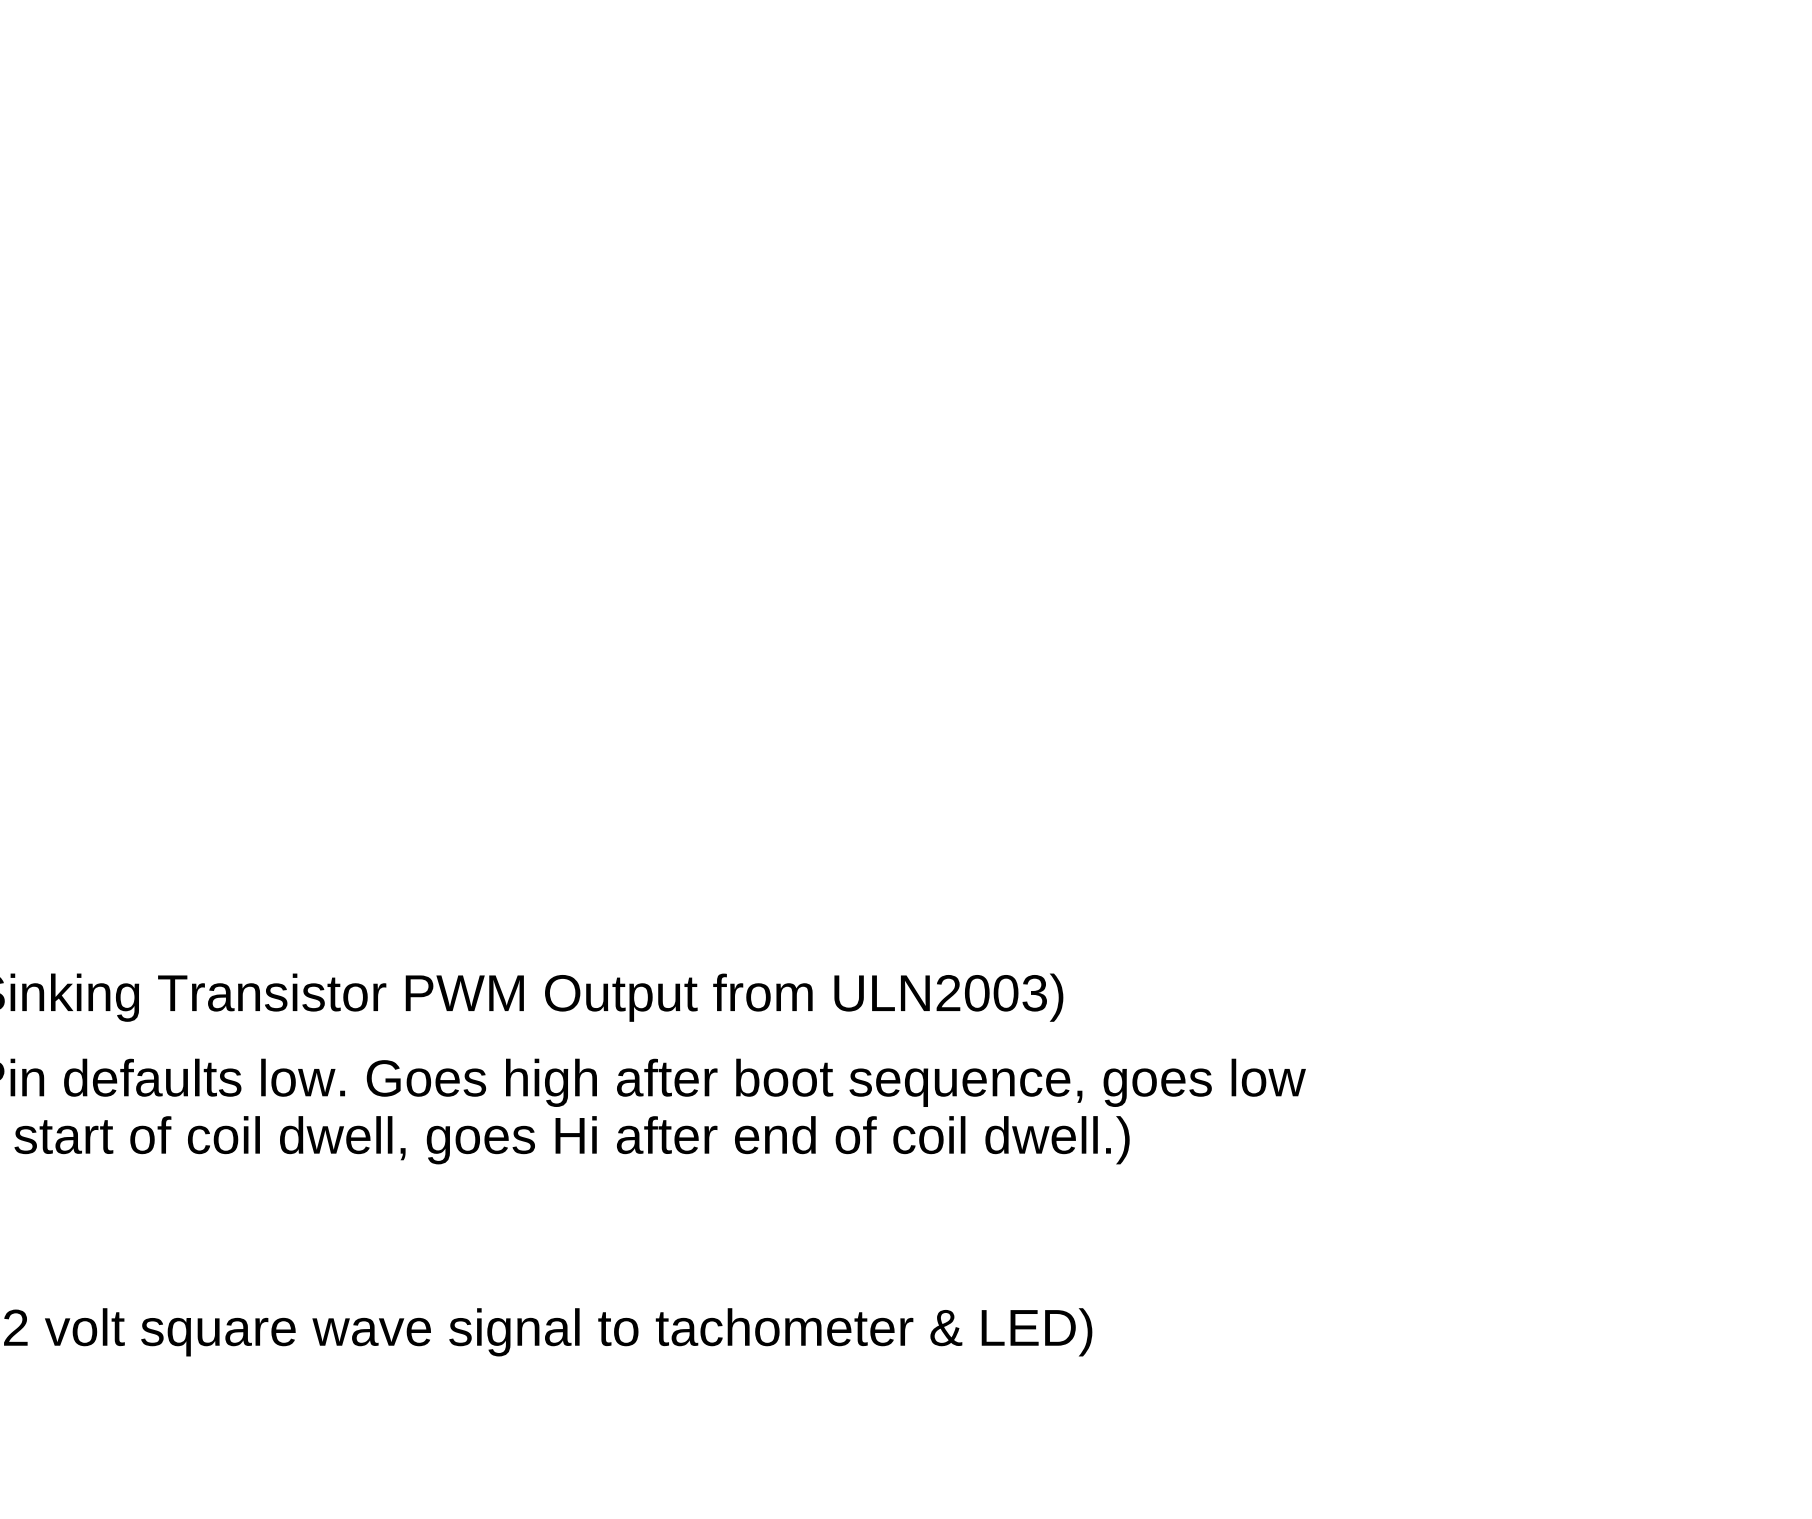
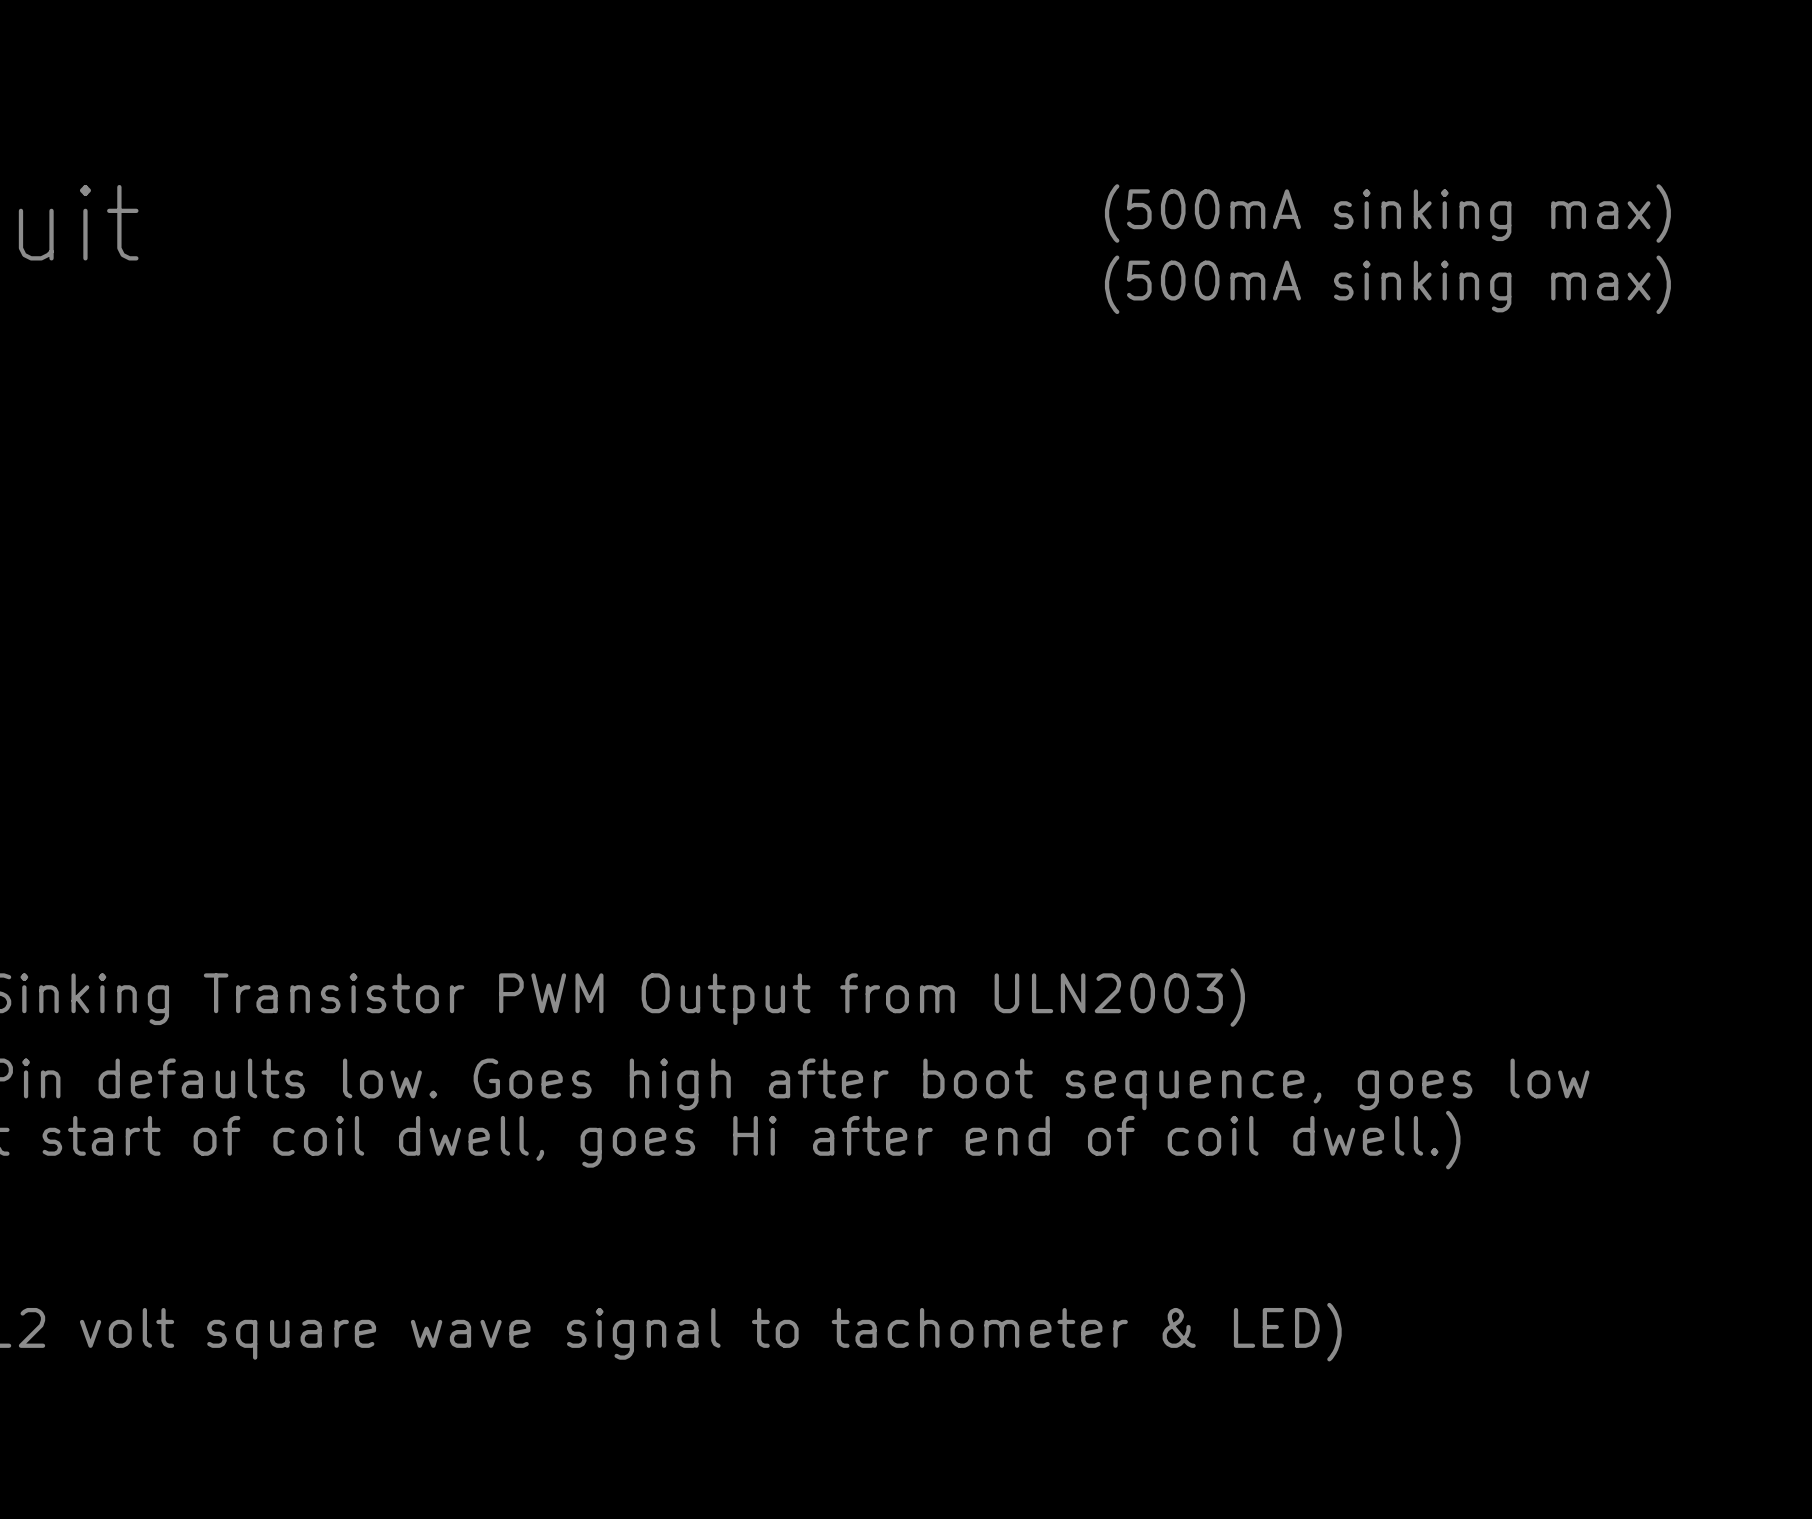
text: none -> (500mA sinking max) (1387, 213)
text: none -> (500mA sinking max) (1387, 284)

